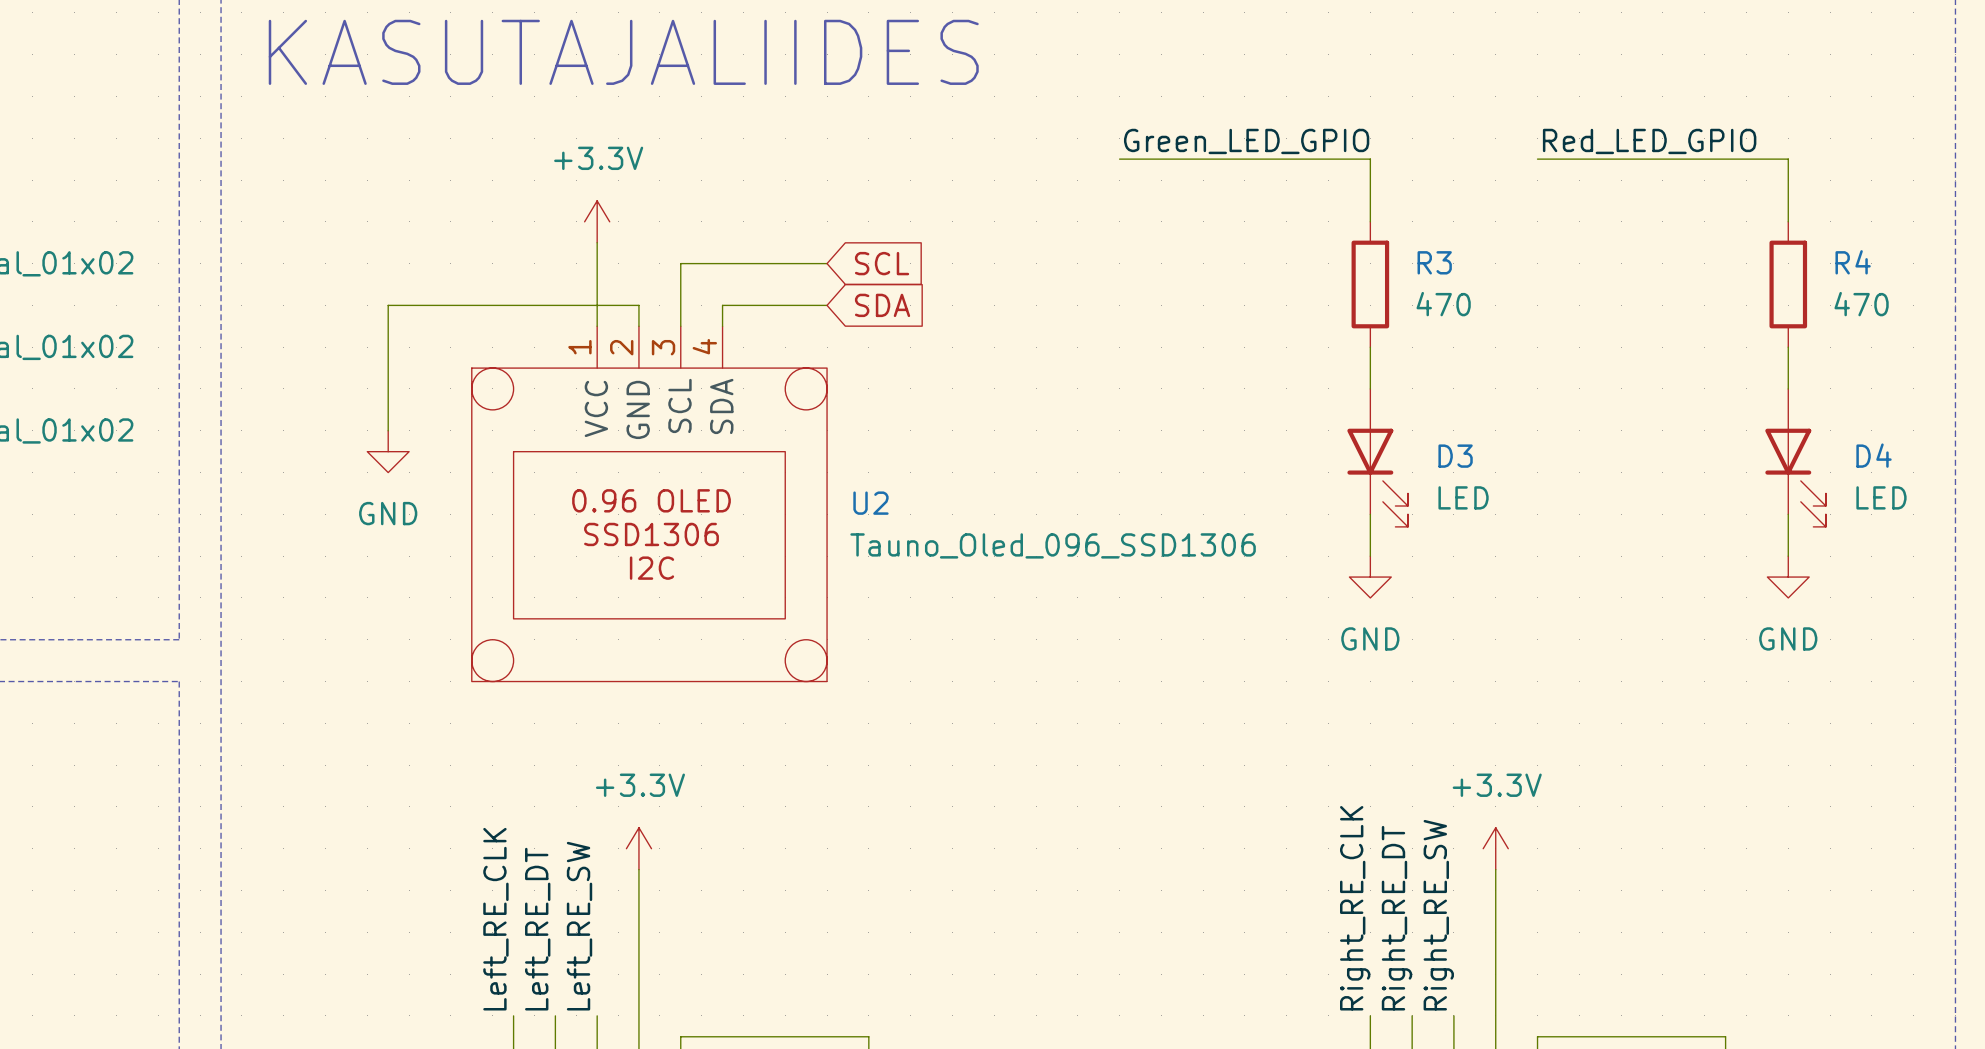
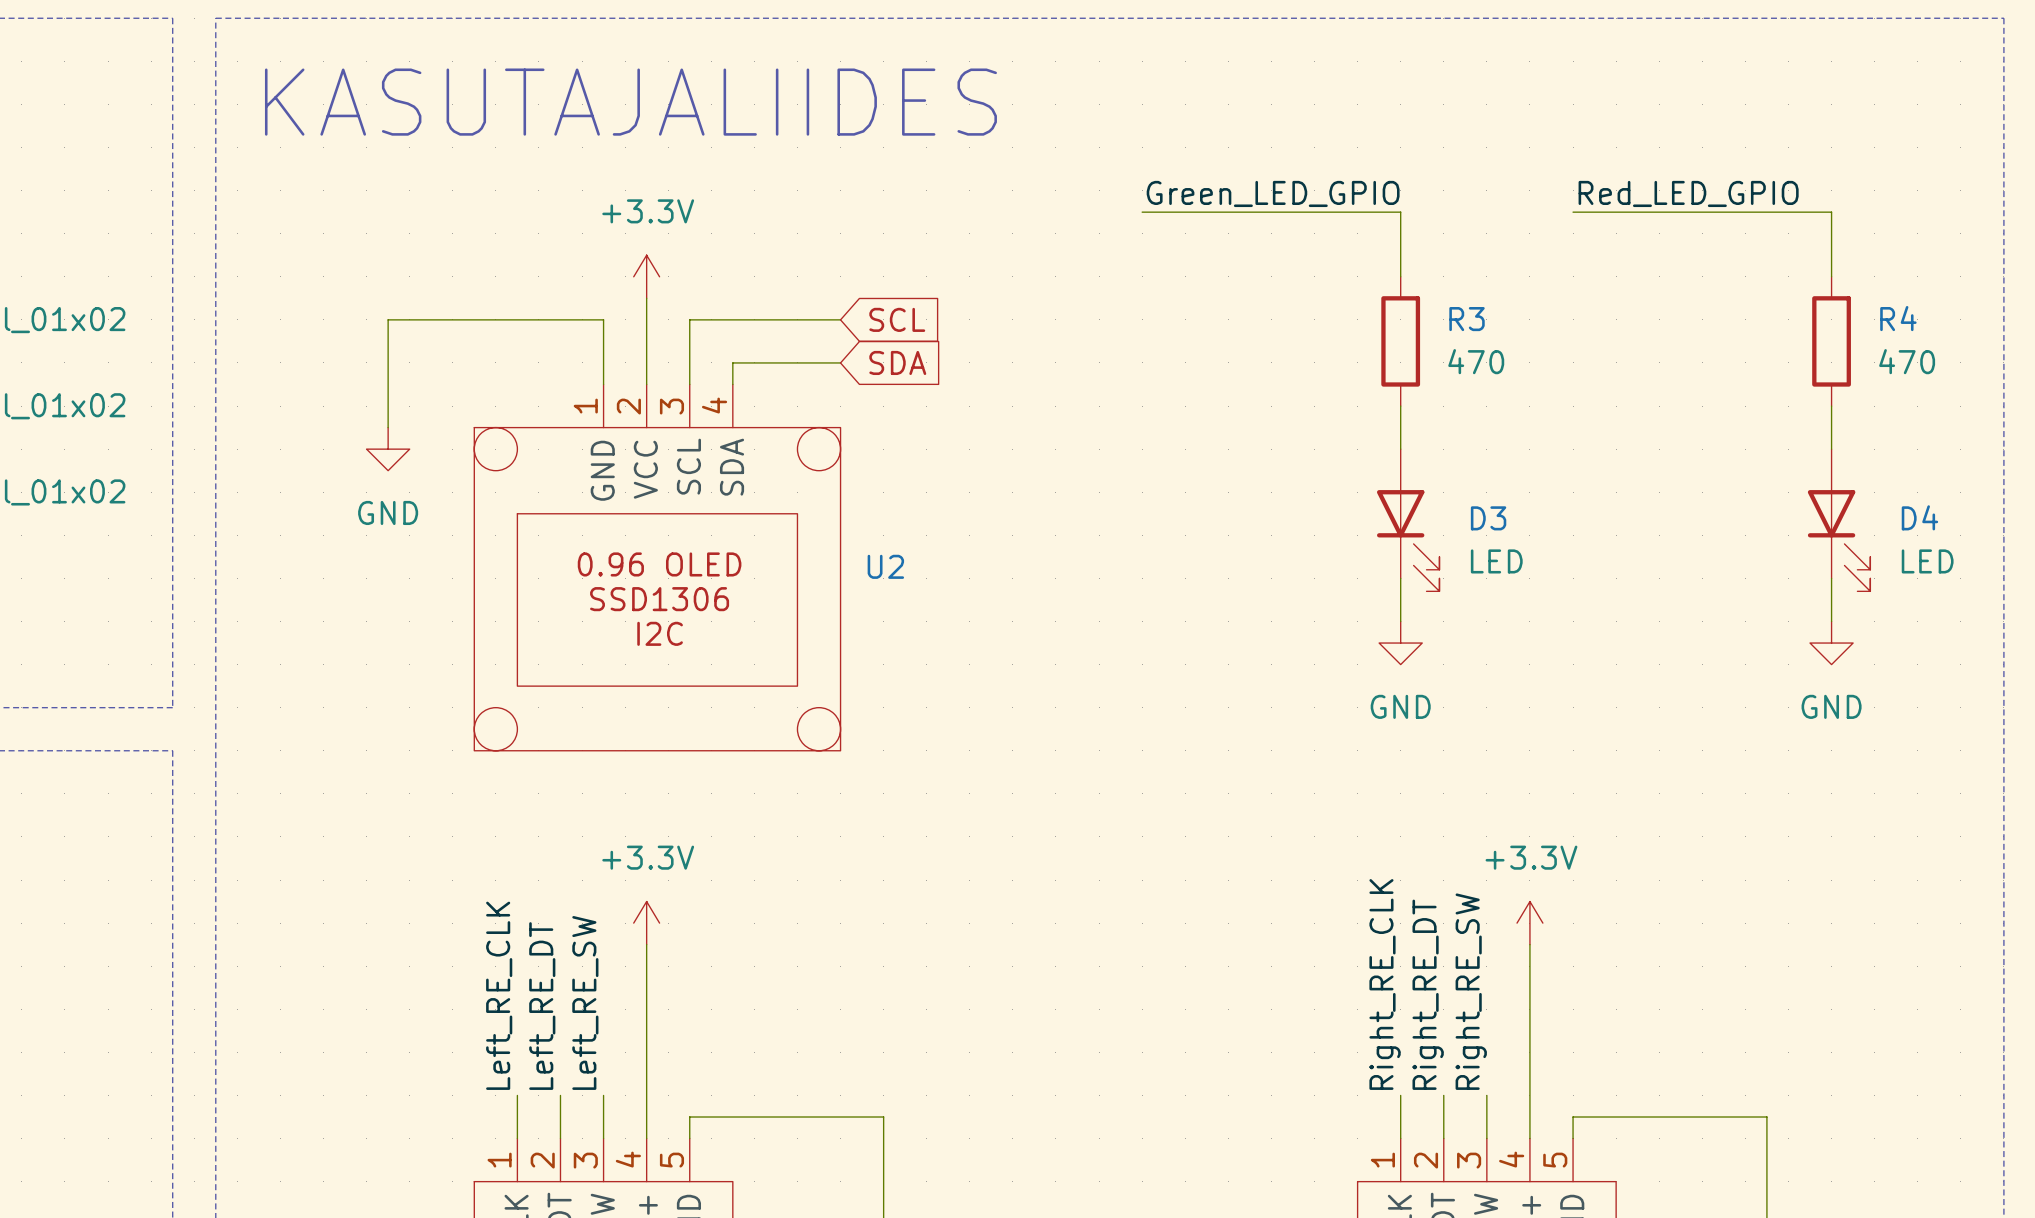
power symbol position: +3.3V (597, 221) -> +3.3V (646, 276)
wire: (597, 242) (597, 263) -> none
wire: (388, 305) (638, 305) -> (388, 362) (388, 319) (603, 319)
wire: (388, 368) (388, 430) -> (646, 298) (646, 362)
U2 pin name: VCC (596, 408) -> GND (602, 470)
U2 pin name: GND (638, 409) -> VCC (645, 469)
power symbol position: GND (388, 451) -> GND (388, 449)
U2 value: Tauno_Oled_096_SSD1306 (1053, 545) -> none

